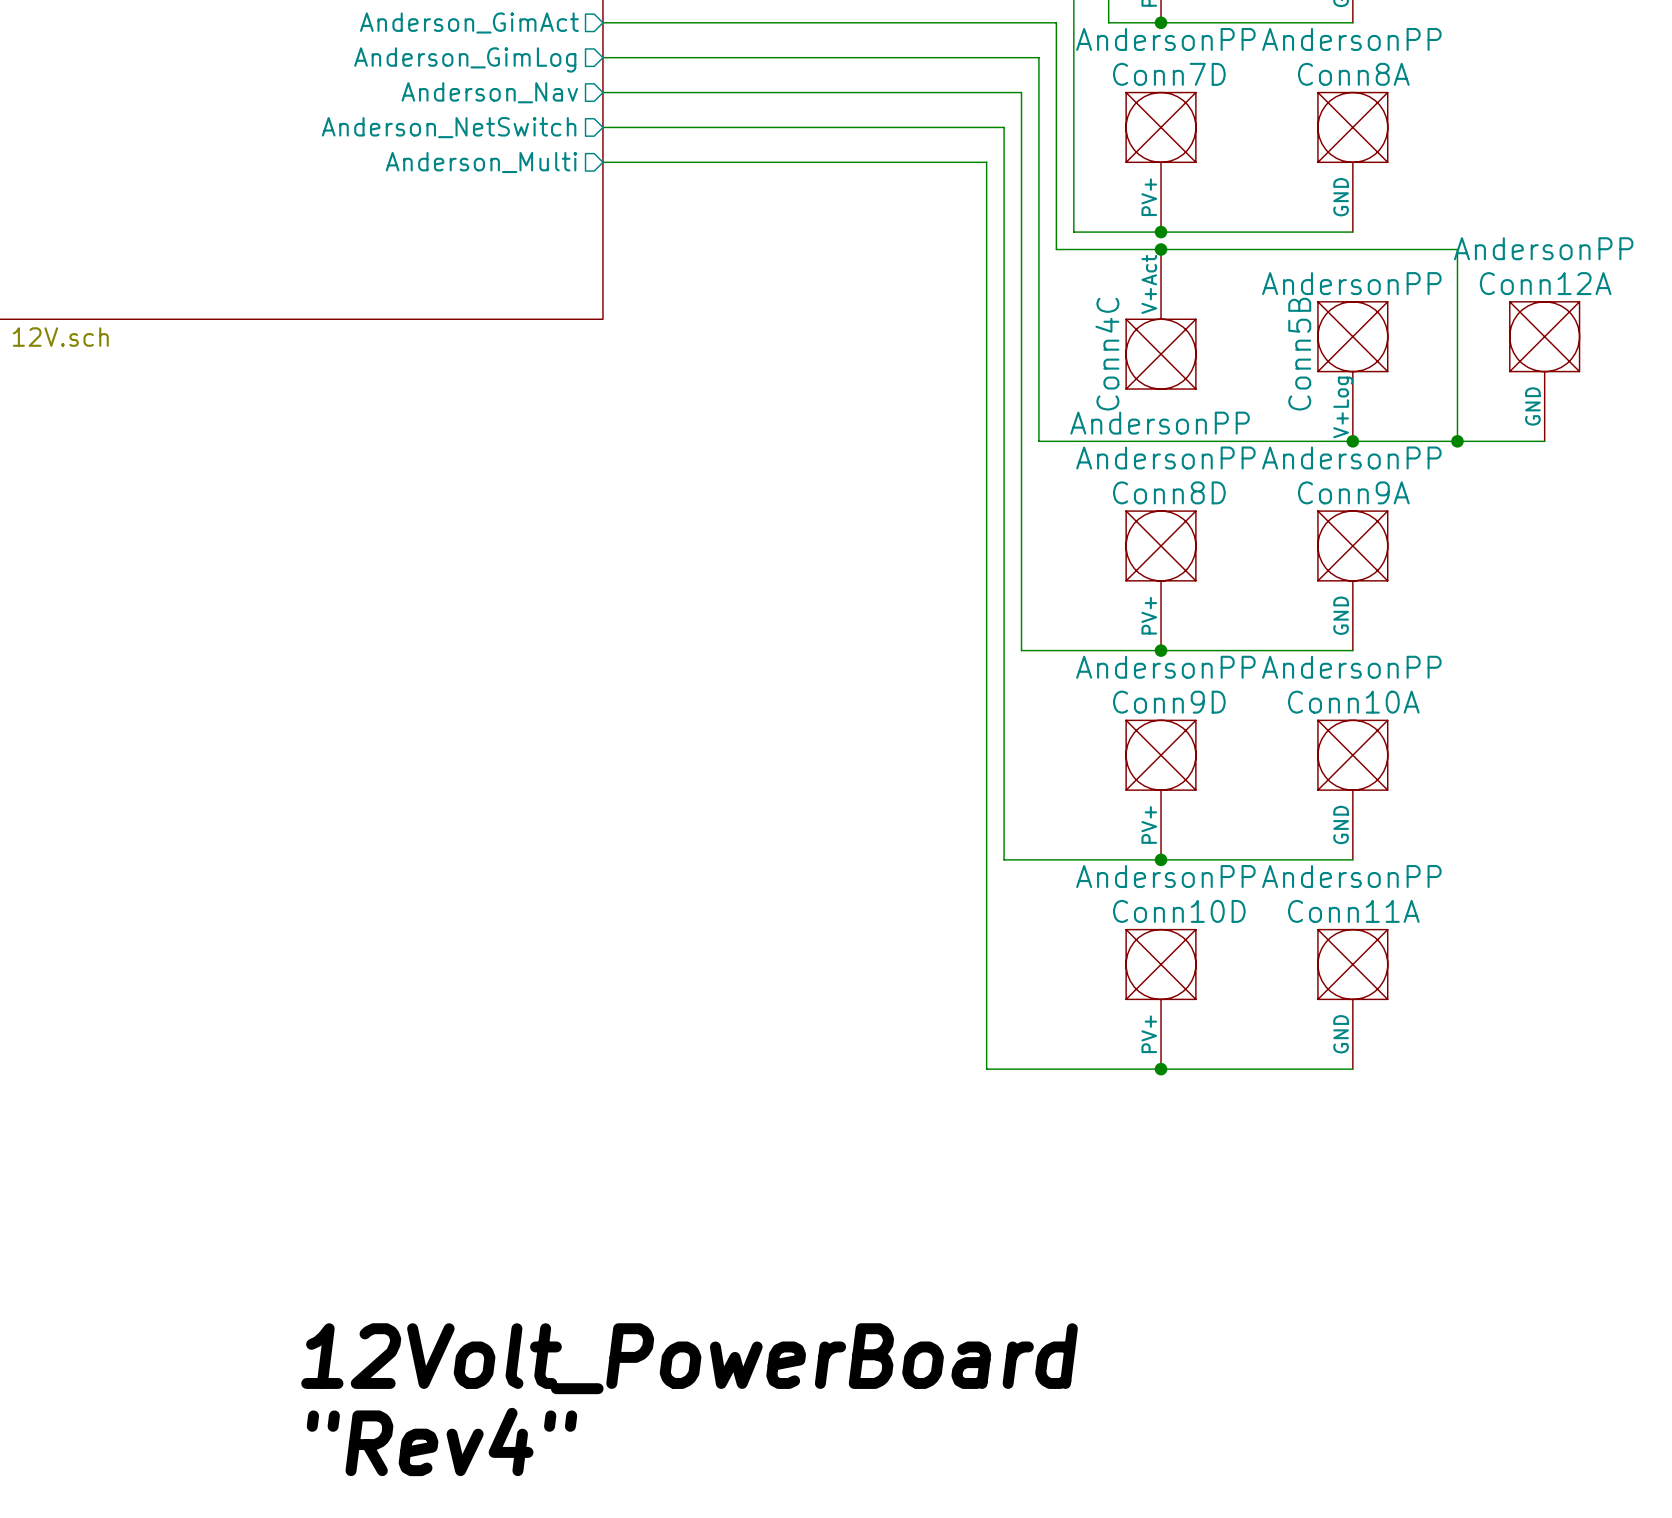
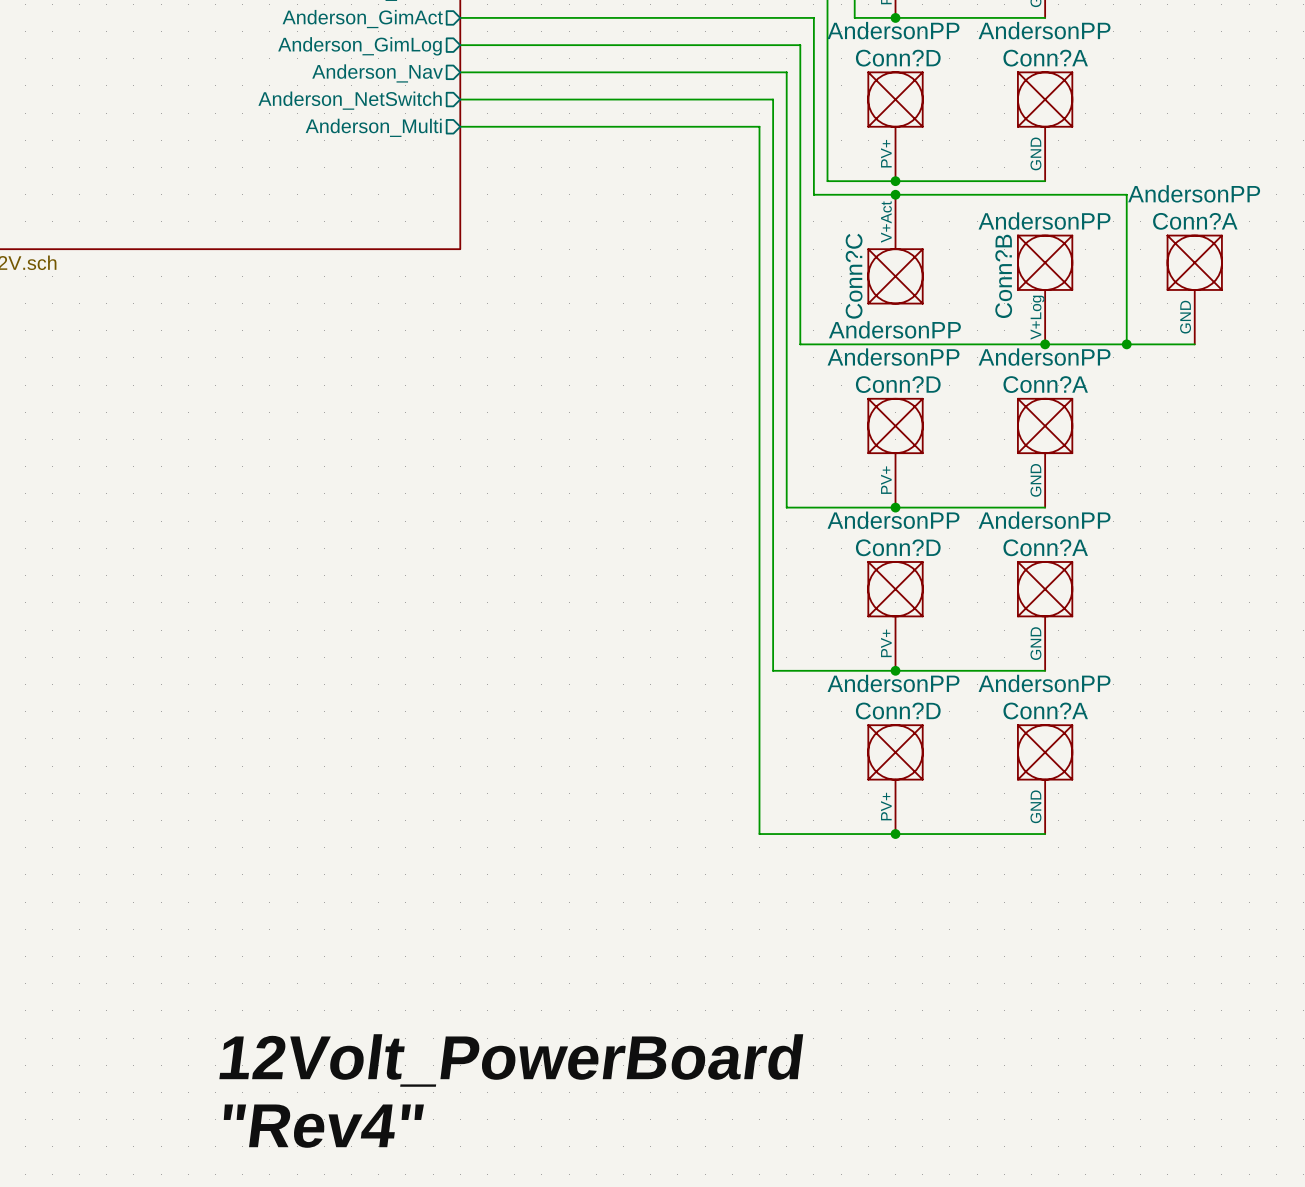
Conn7D name: Conn7D (1169, 74) -> Conn?D (898, 58)
Conn8A name: Conn8A (1353, 74) -> Conn?A (1045, 58)
Conn12A name: Conn12A (1545, 283) -> Conn?A (1195, 221)
Conn4C name: Conn4C (1107, 354) -> Conn?C (854, 276)
Conn5B name: Conn5B (1299, 354) -> Conn?B (1003, 276)
Conn8D name: Conn8D (1169, 492) -> Conn?D (898, 384)
Conn9A name: Conn9A (1353, 492) -> Conn?A (1045, 384)
Conn9D name: Conn9D (1169, 702) -> Conn?D (898, 547)
Conn10A name: Conn10A (1353, 702) -> Conn?A (1045, 547)
Conn10D name: Conn10D (1179, 911) -> Conn?D (898, 711)
Conn11A name: Conn11A (1353, 911) -> Conn?A (1045, 711)

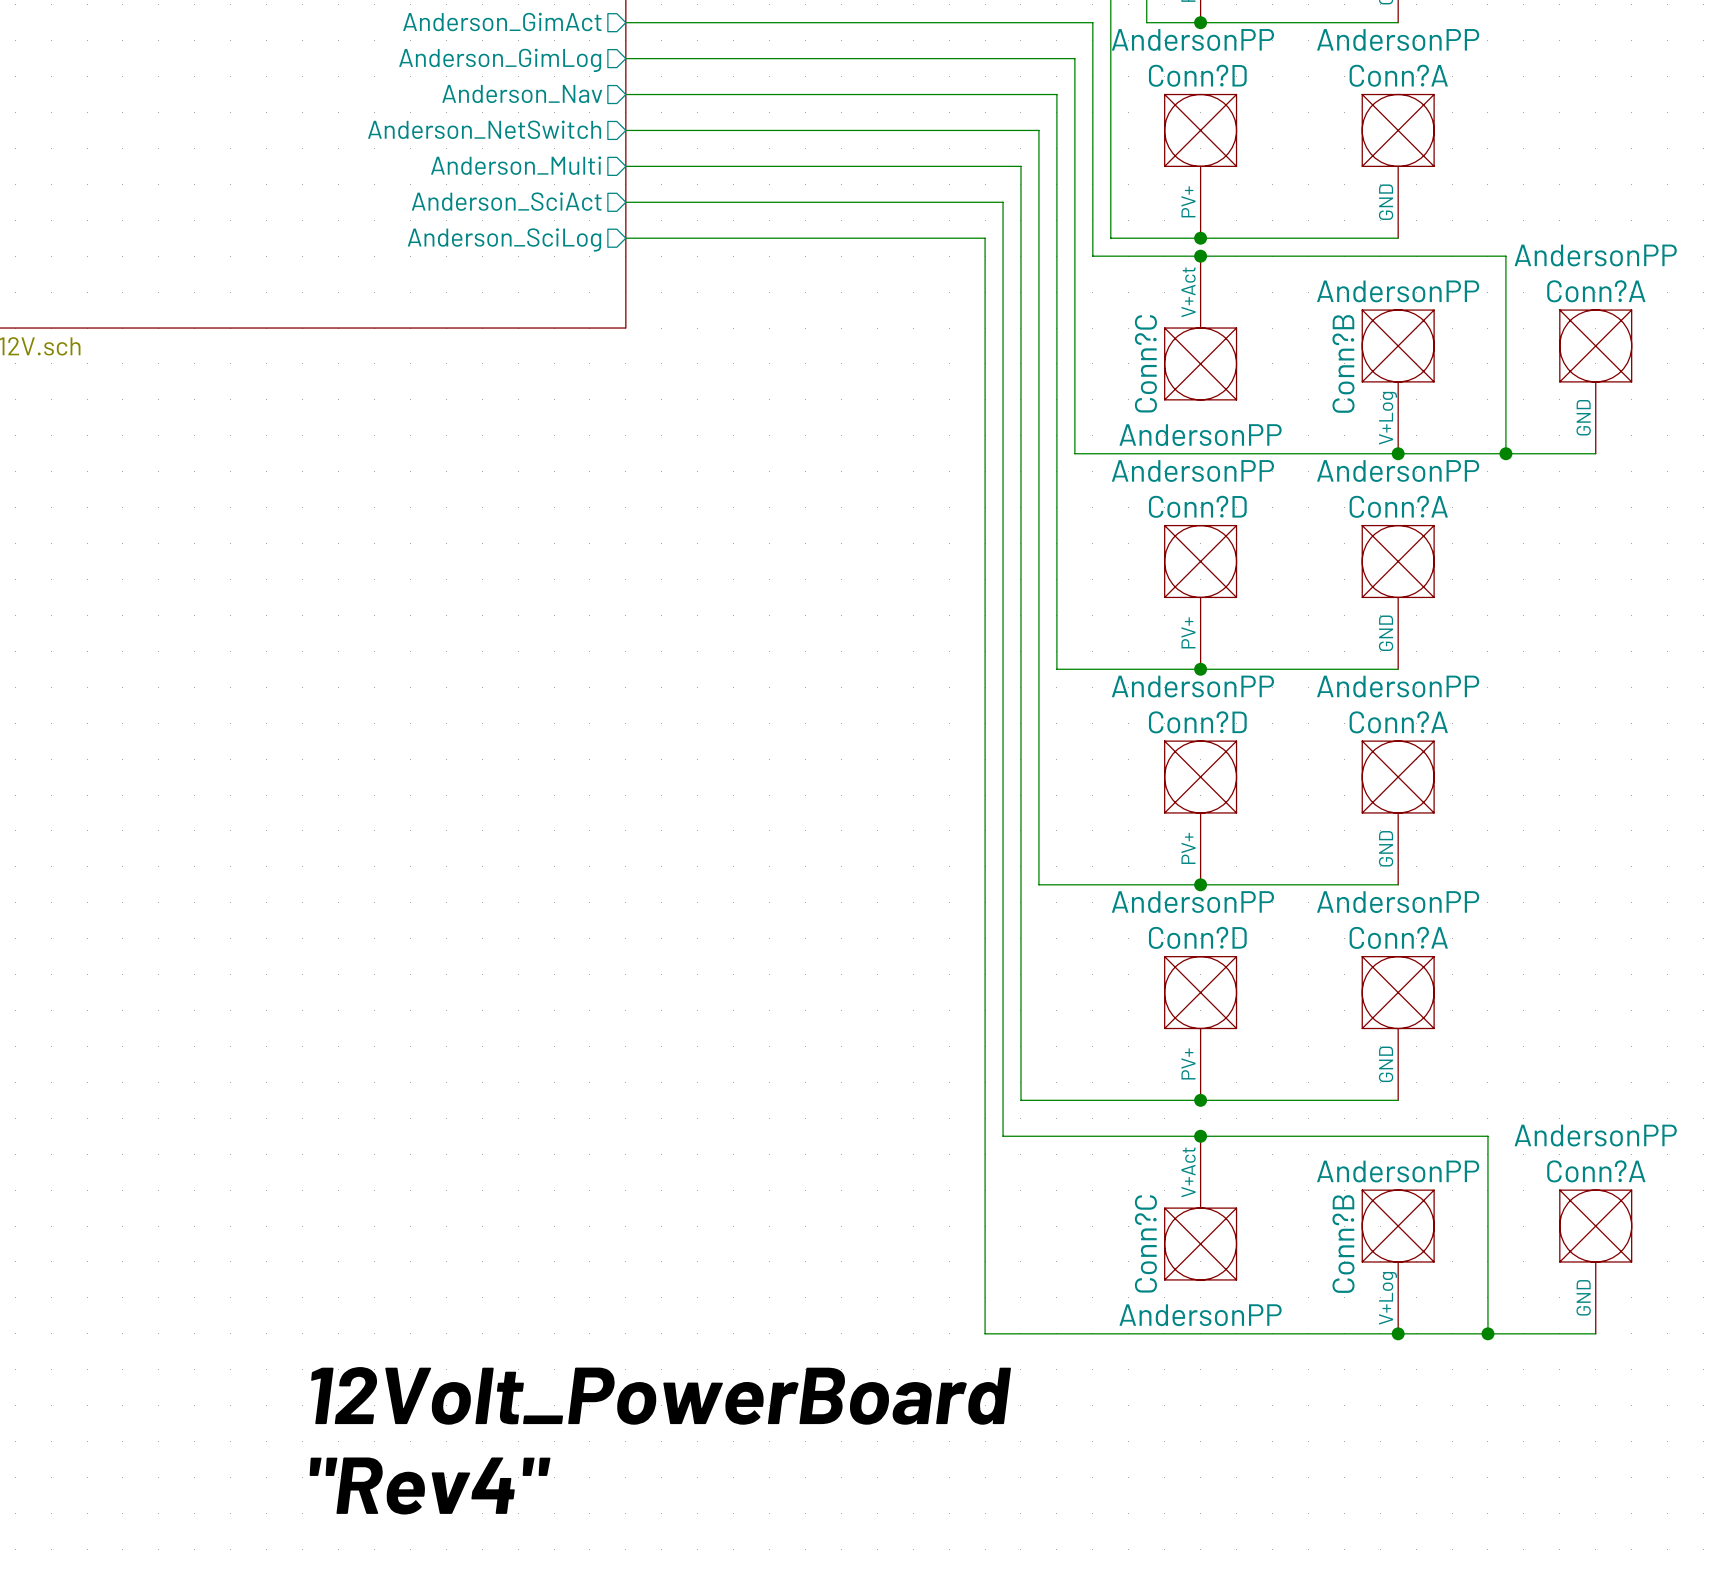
wire: none -> (625, 202) (1003, 202) (1003, 1136) (1487, 1136) (1487, 1333)
sheet pin: none -> Anderson_SciAct (506, 201)
wire: none -> (625, 238) (985, 238) (985, 1333) (1595, 1333)
sheet pin: none -> Anderson_SciLog (504, 239)
junction: none -> (1200, 1136)
Conn?C: none -> AndersonPP (1200, 1208)
Conn?B: none -> AndersonPP (1398, 1261)
Conn?A: none -> AndersonPP (1595, 1261)
junction: none -> (1398, 1333)
junction: none -> (1487, 1333)

